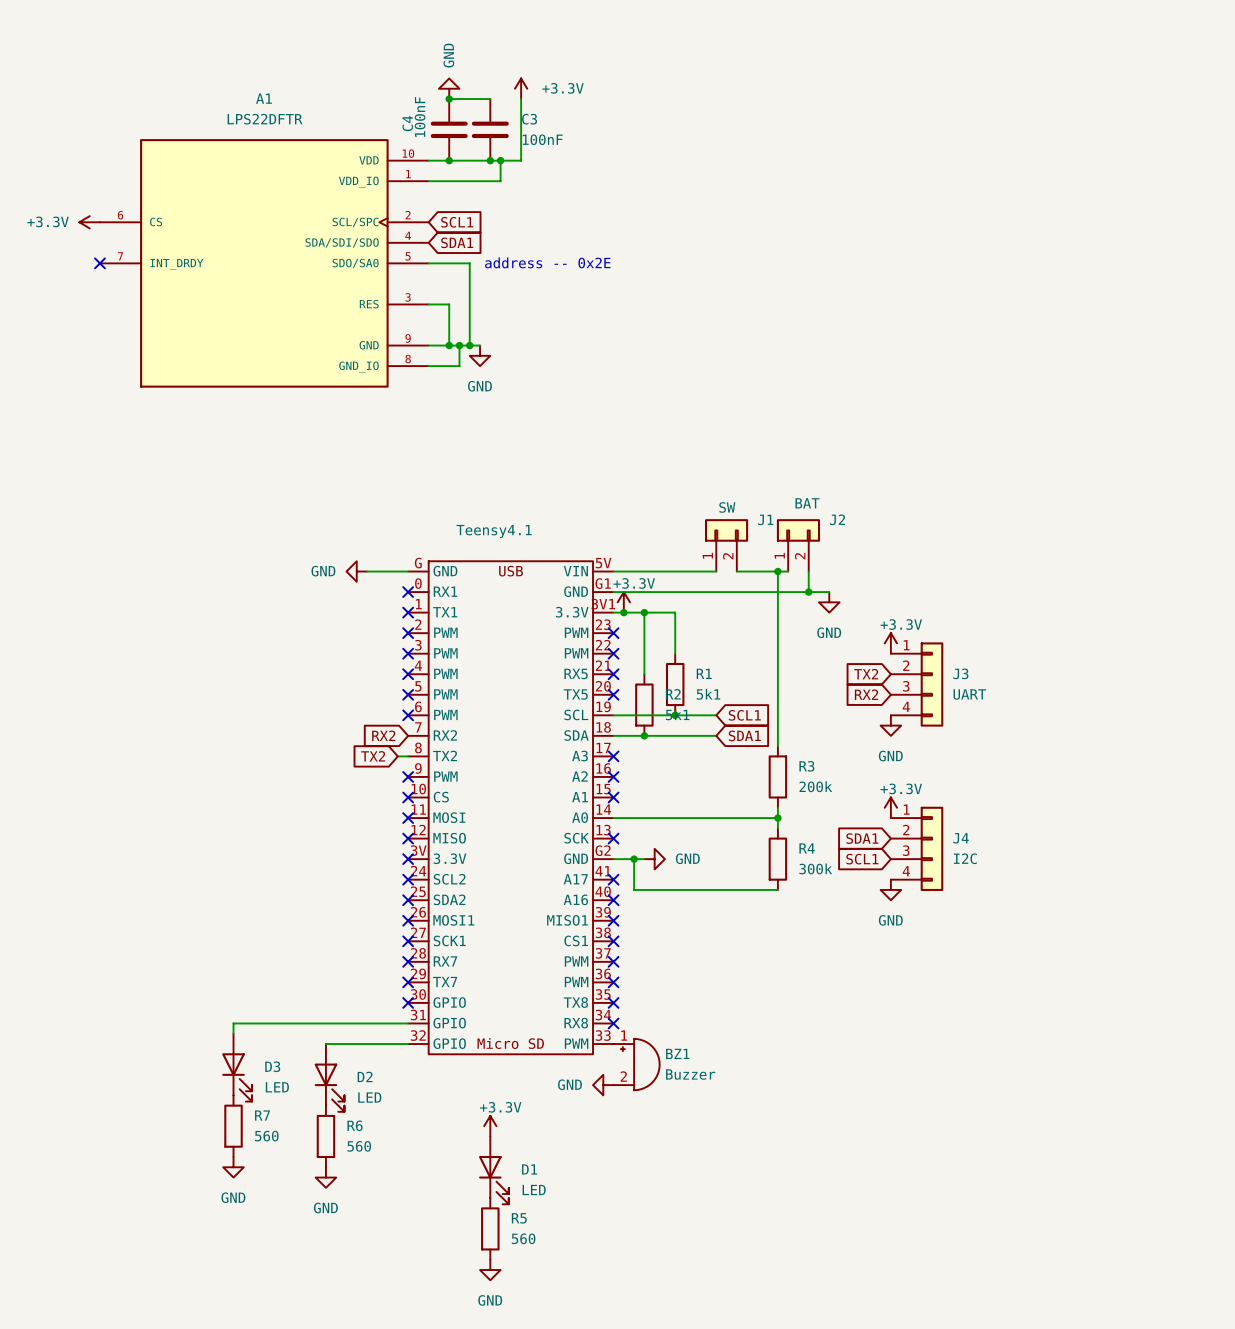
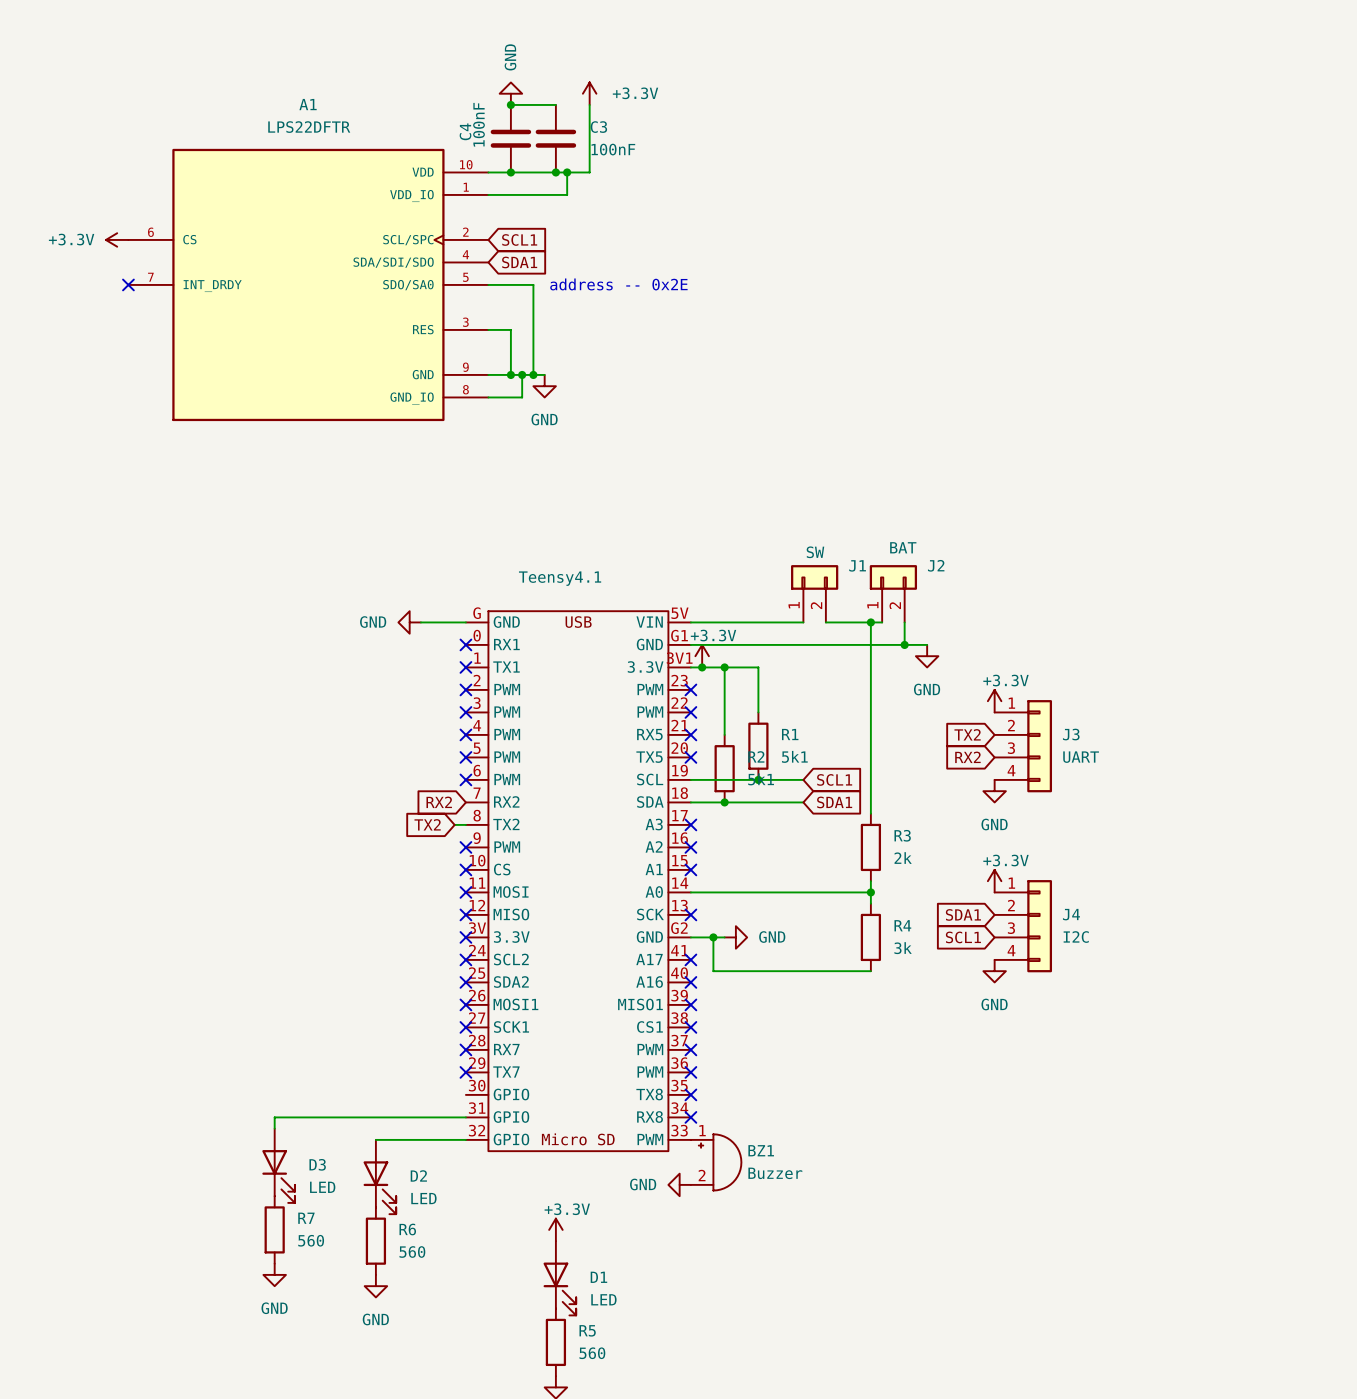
R3 value: 200k (815, 786) -> 2k (903, 858)
R4 value: 300k (815, 868) -> 3k (903, 948)
no-connect mark: (408, 1002) -> none

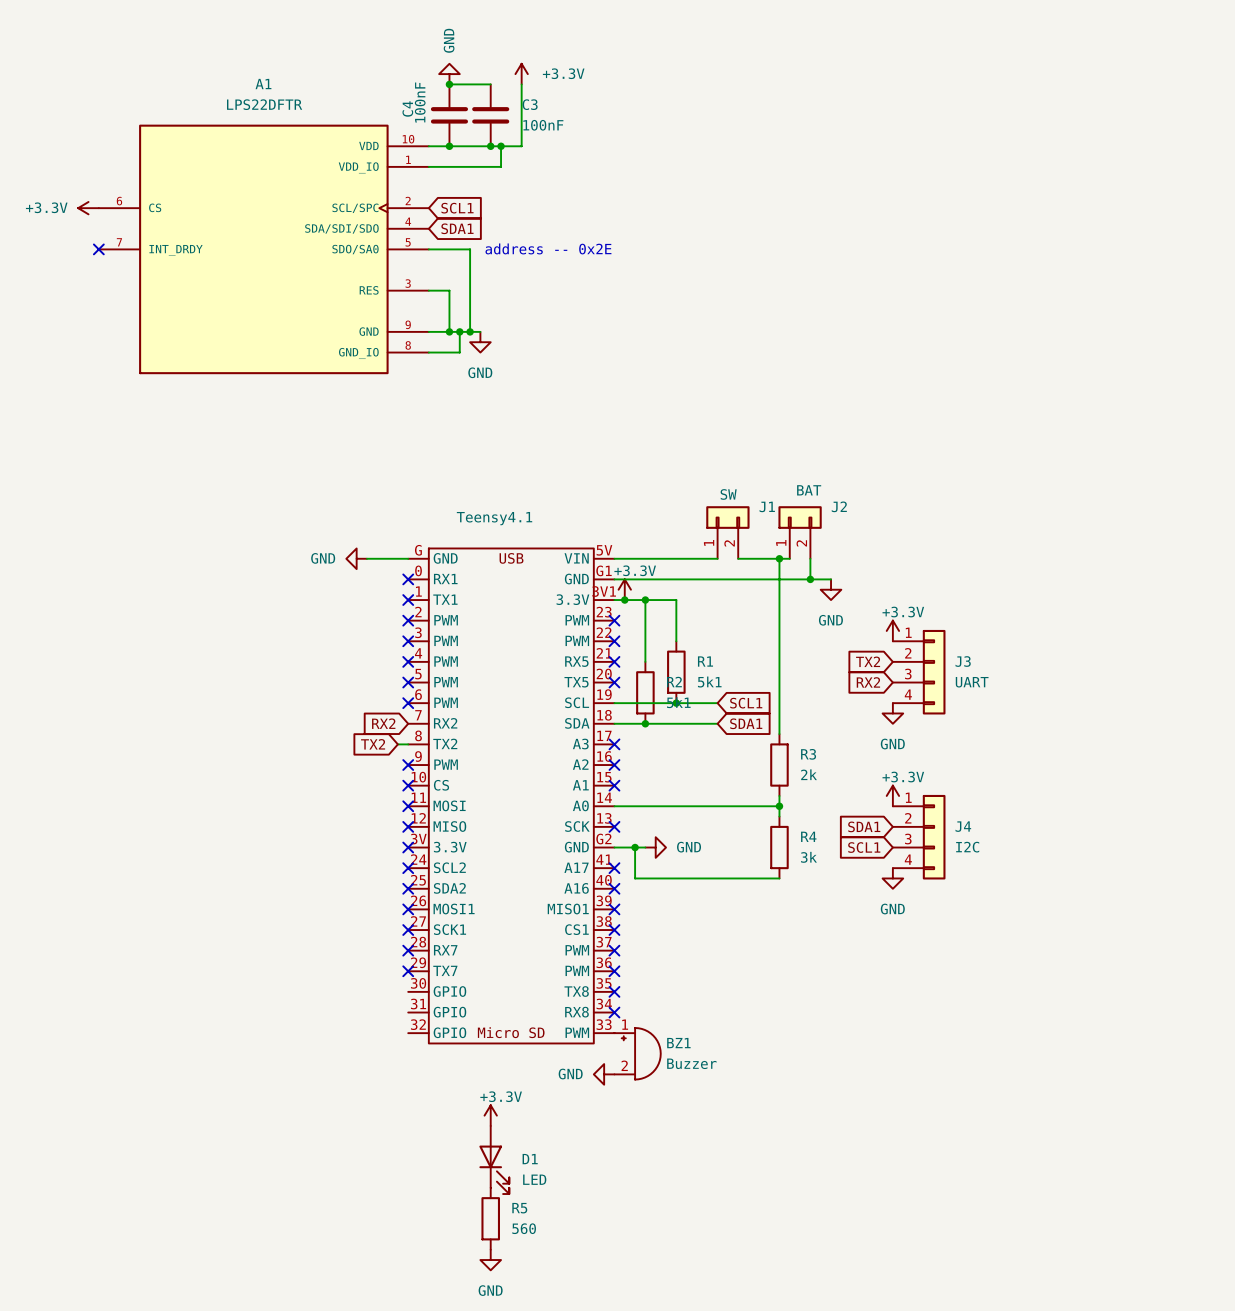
wire: (465, 1117) (274, 1117) (274, 1128) -> none
wire: (375, 1139) (465, 1139) -> none
D3: LED (278, 1165) -> none
D2: LED (379, 1177) -> none
R7: 560 (274, 1229) -> none
R6: 560 (375, 1241) -> none
power symbol: GND (274, 1274) -> none
power symbol: GND (375, 1286) -> none

